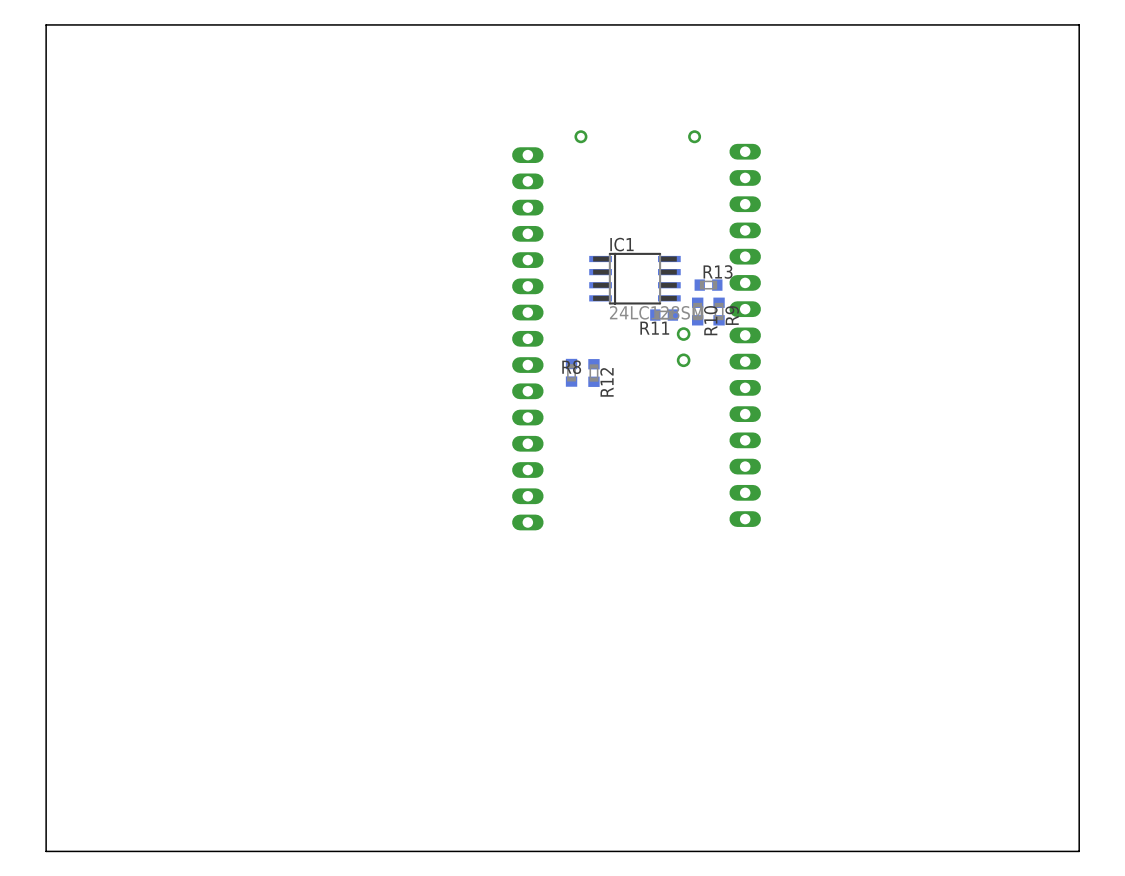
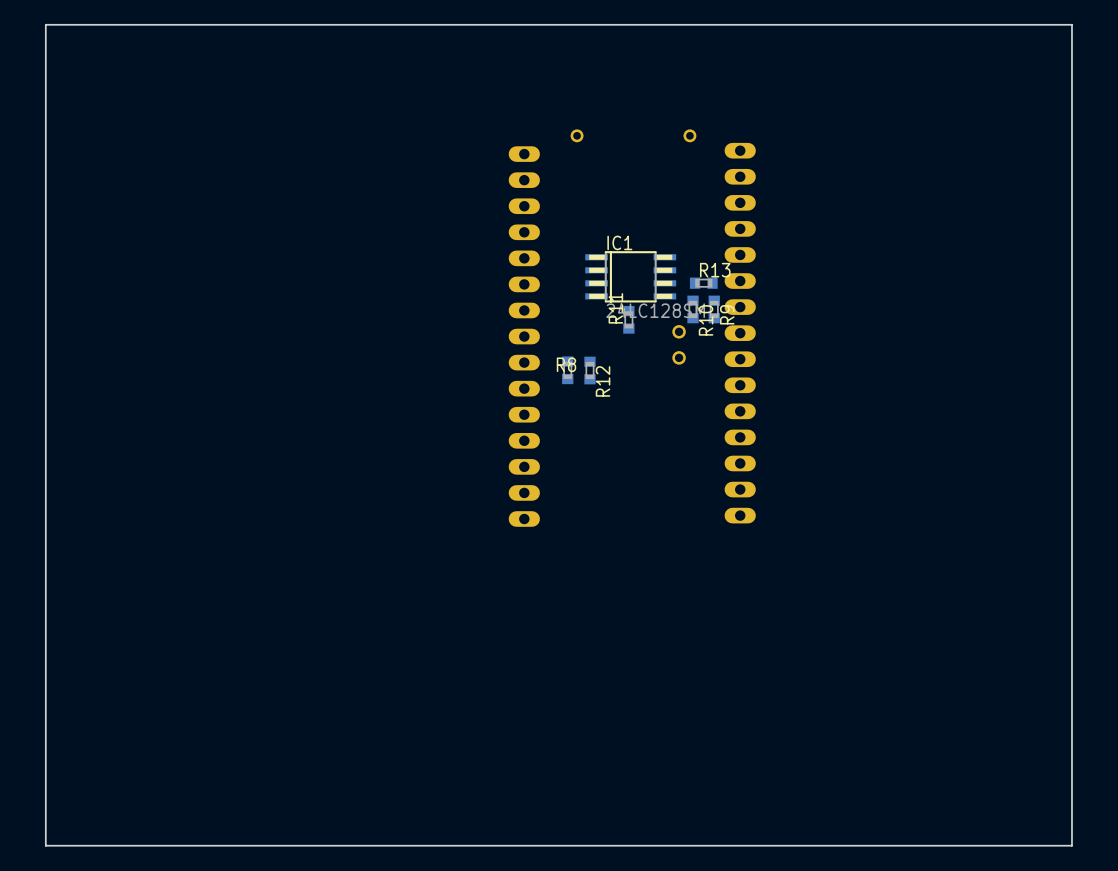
R11 rotation: 0° (664, 315) -> 90° clockwise (628, 319)
R11 position: (664, 315) -> (628, 319)

